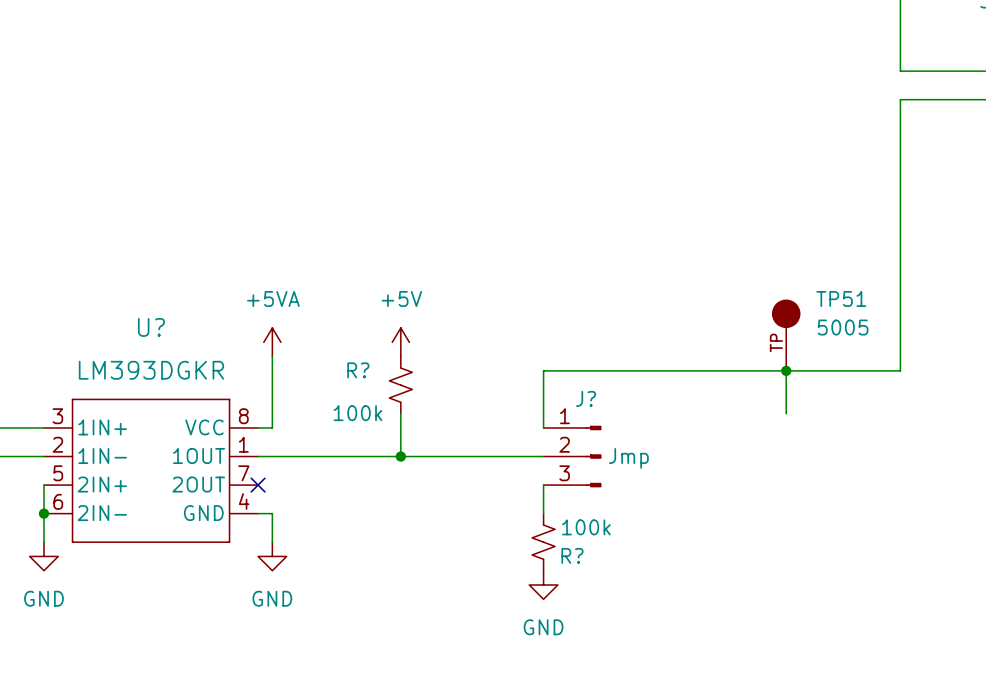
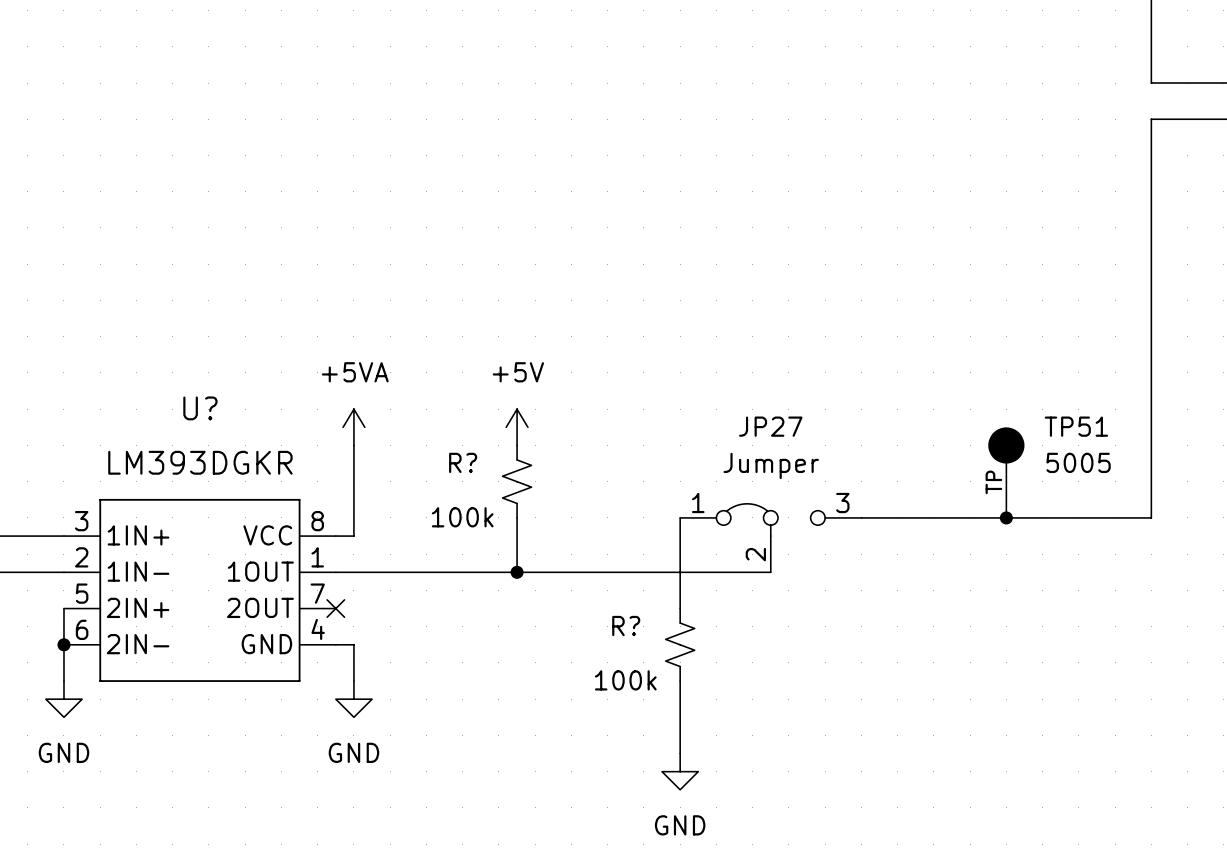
TP51 position: (786, 335) -> (1006, 472)
junction position: (786, 370) -> (1006, 517)
wire: (900, 370) (543, 370) (543, 427) -> (1151, 463) (1151, 517) (861, 517)
wire: none -> (680, 517) (680, 608)
JP27: none -> Jumper (770, 538)
J?: Jmp (572, 456) -> none
wire: (543, 485) (543, 513) -> none
R? value position: 100k (586, 527) -> 100k (625, 680)
wire: none -> (680, 681) (680, 753)
R? position: (543, 542) -> (680, 644)
R? name position: R? (572, 555) -> R? (626, 626)
power symbol position: GND (543, 585) -> GND (680, 771)

